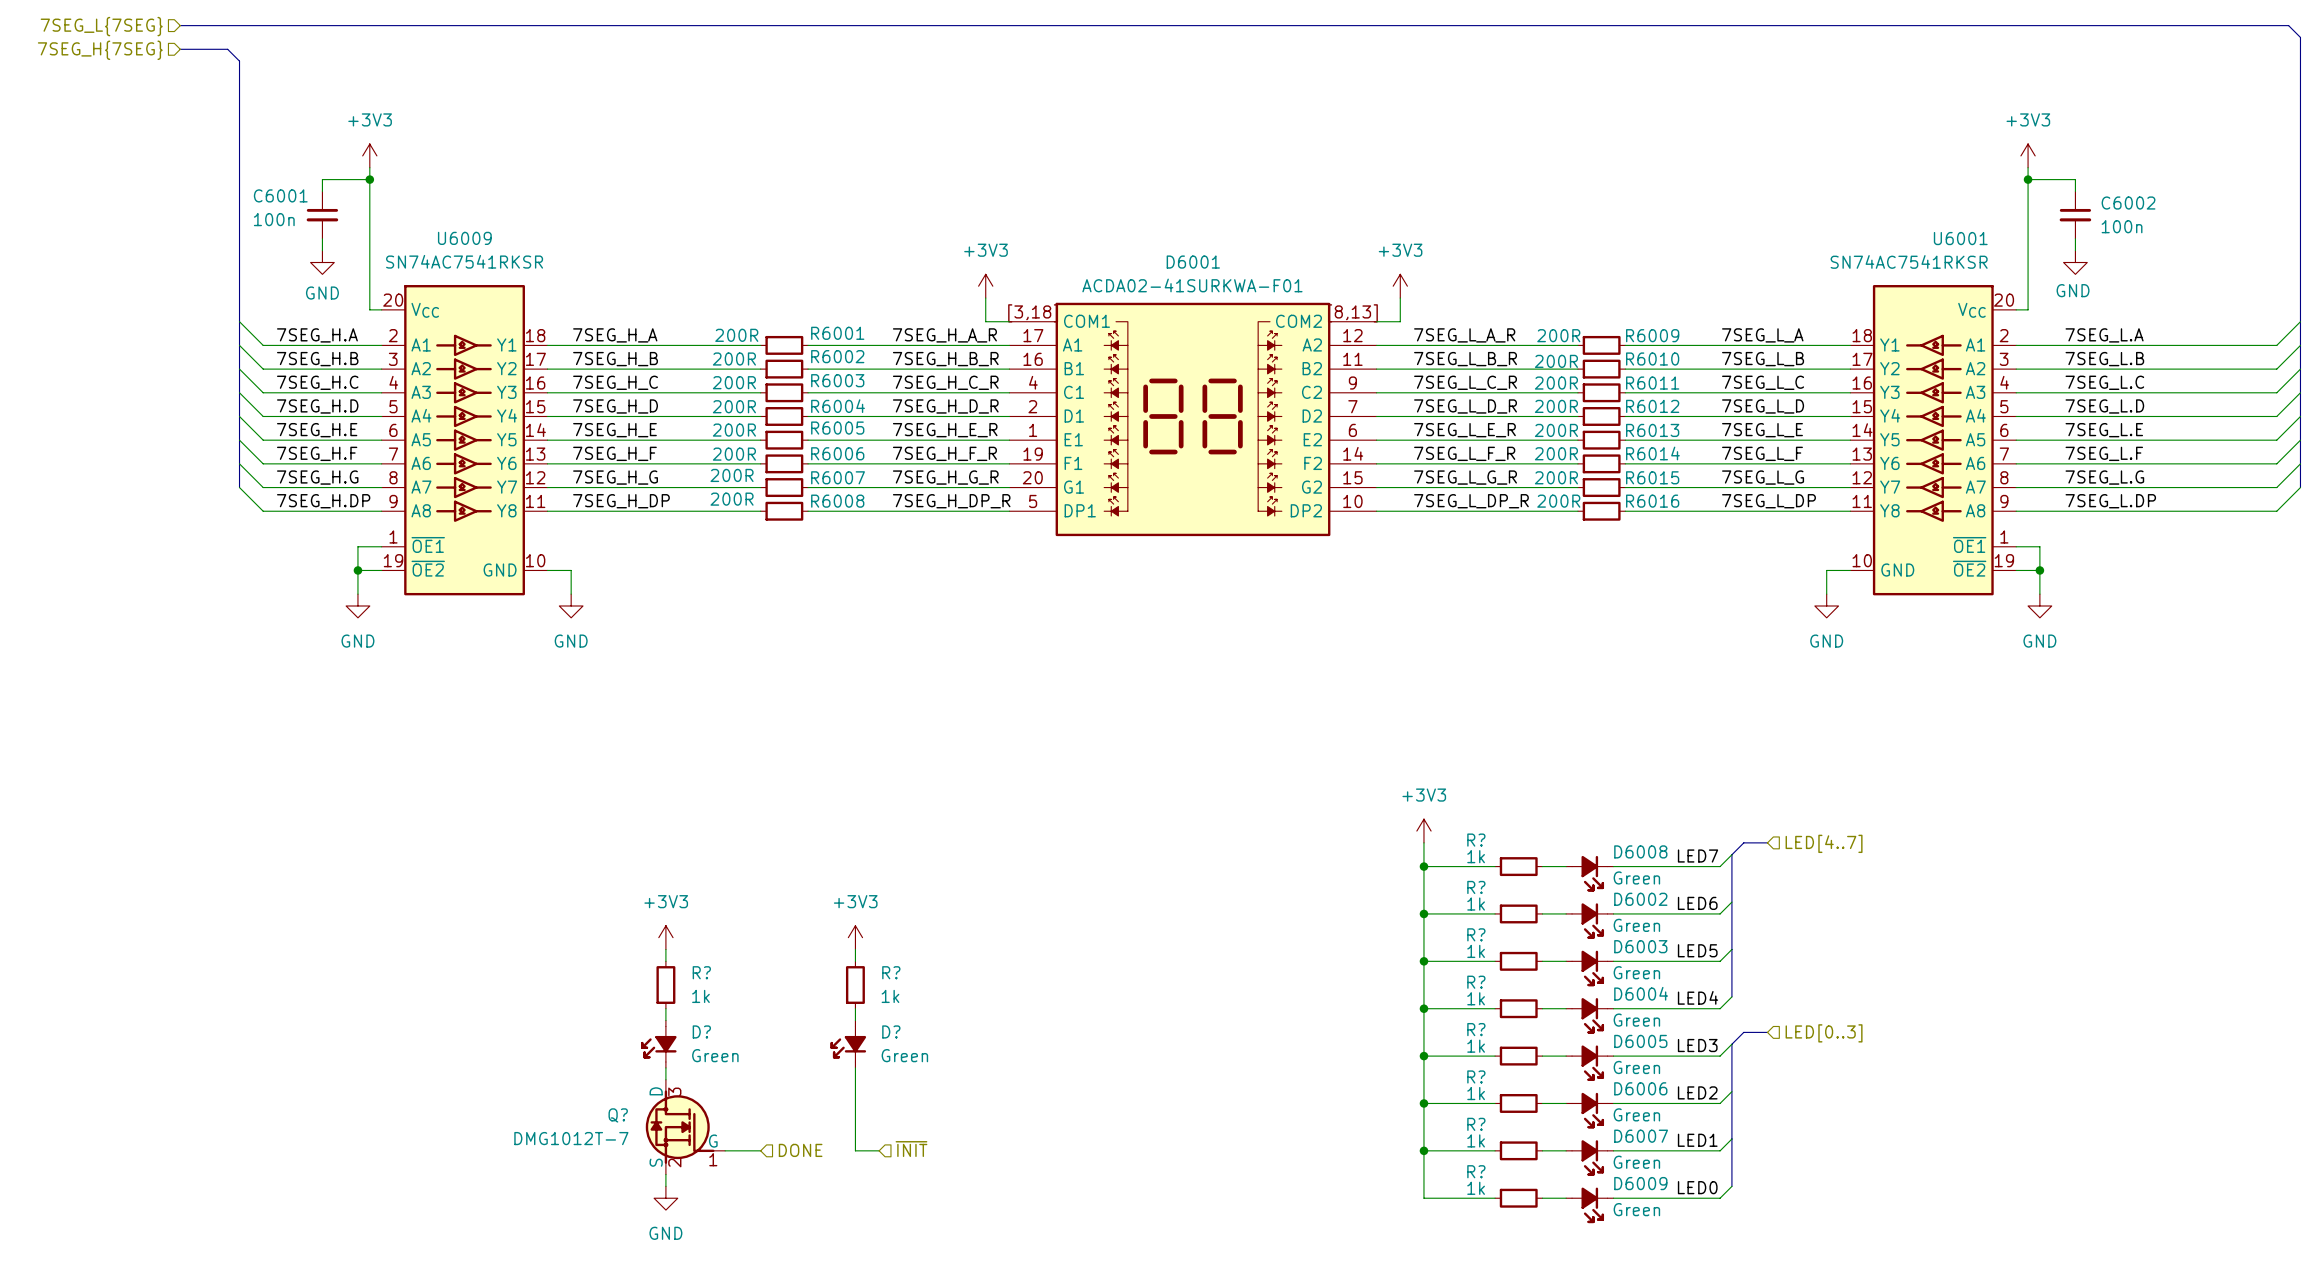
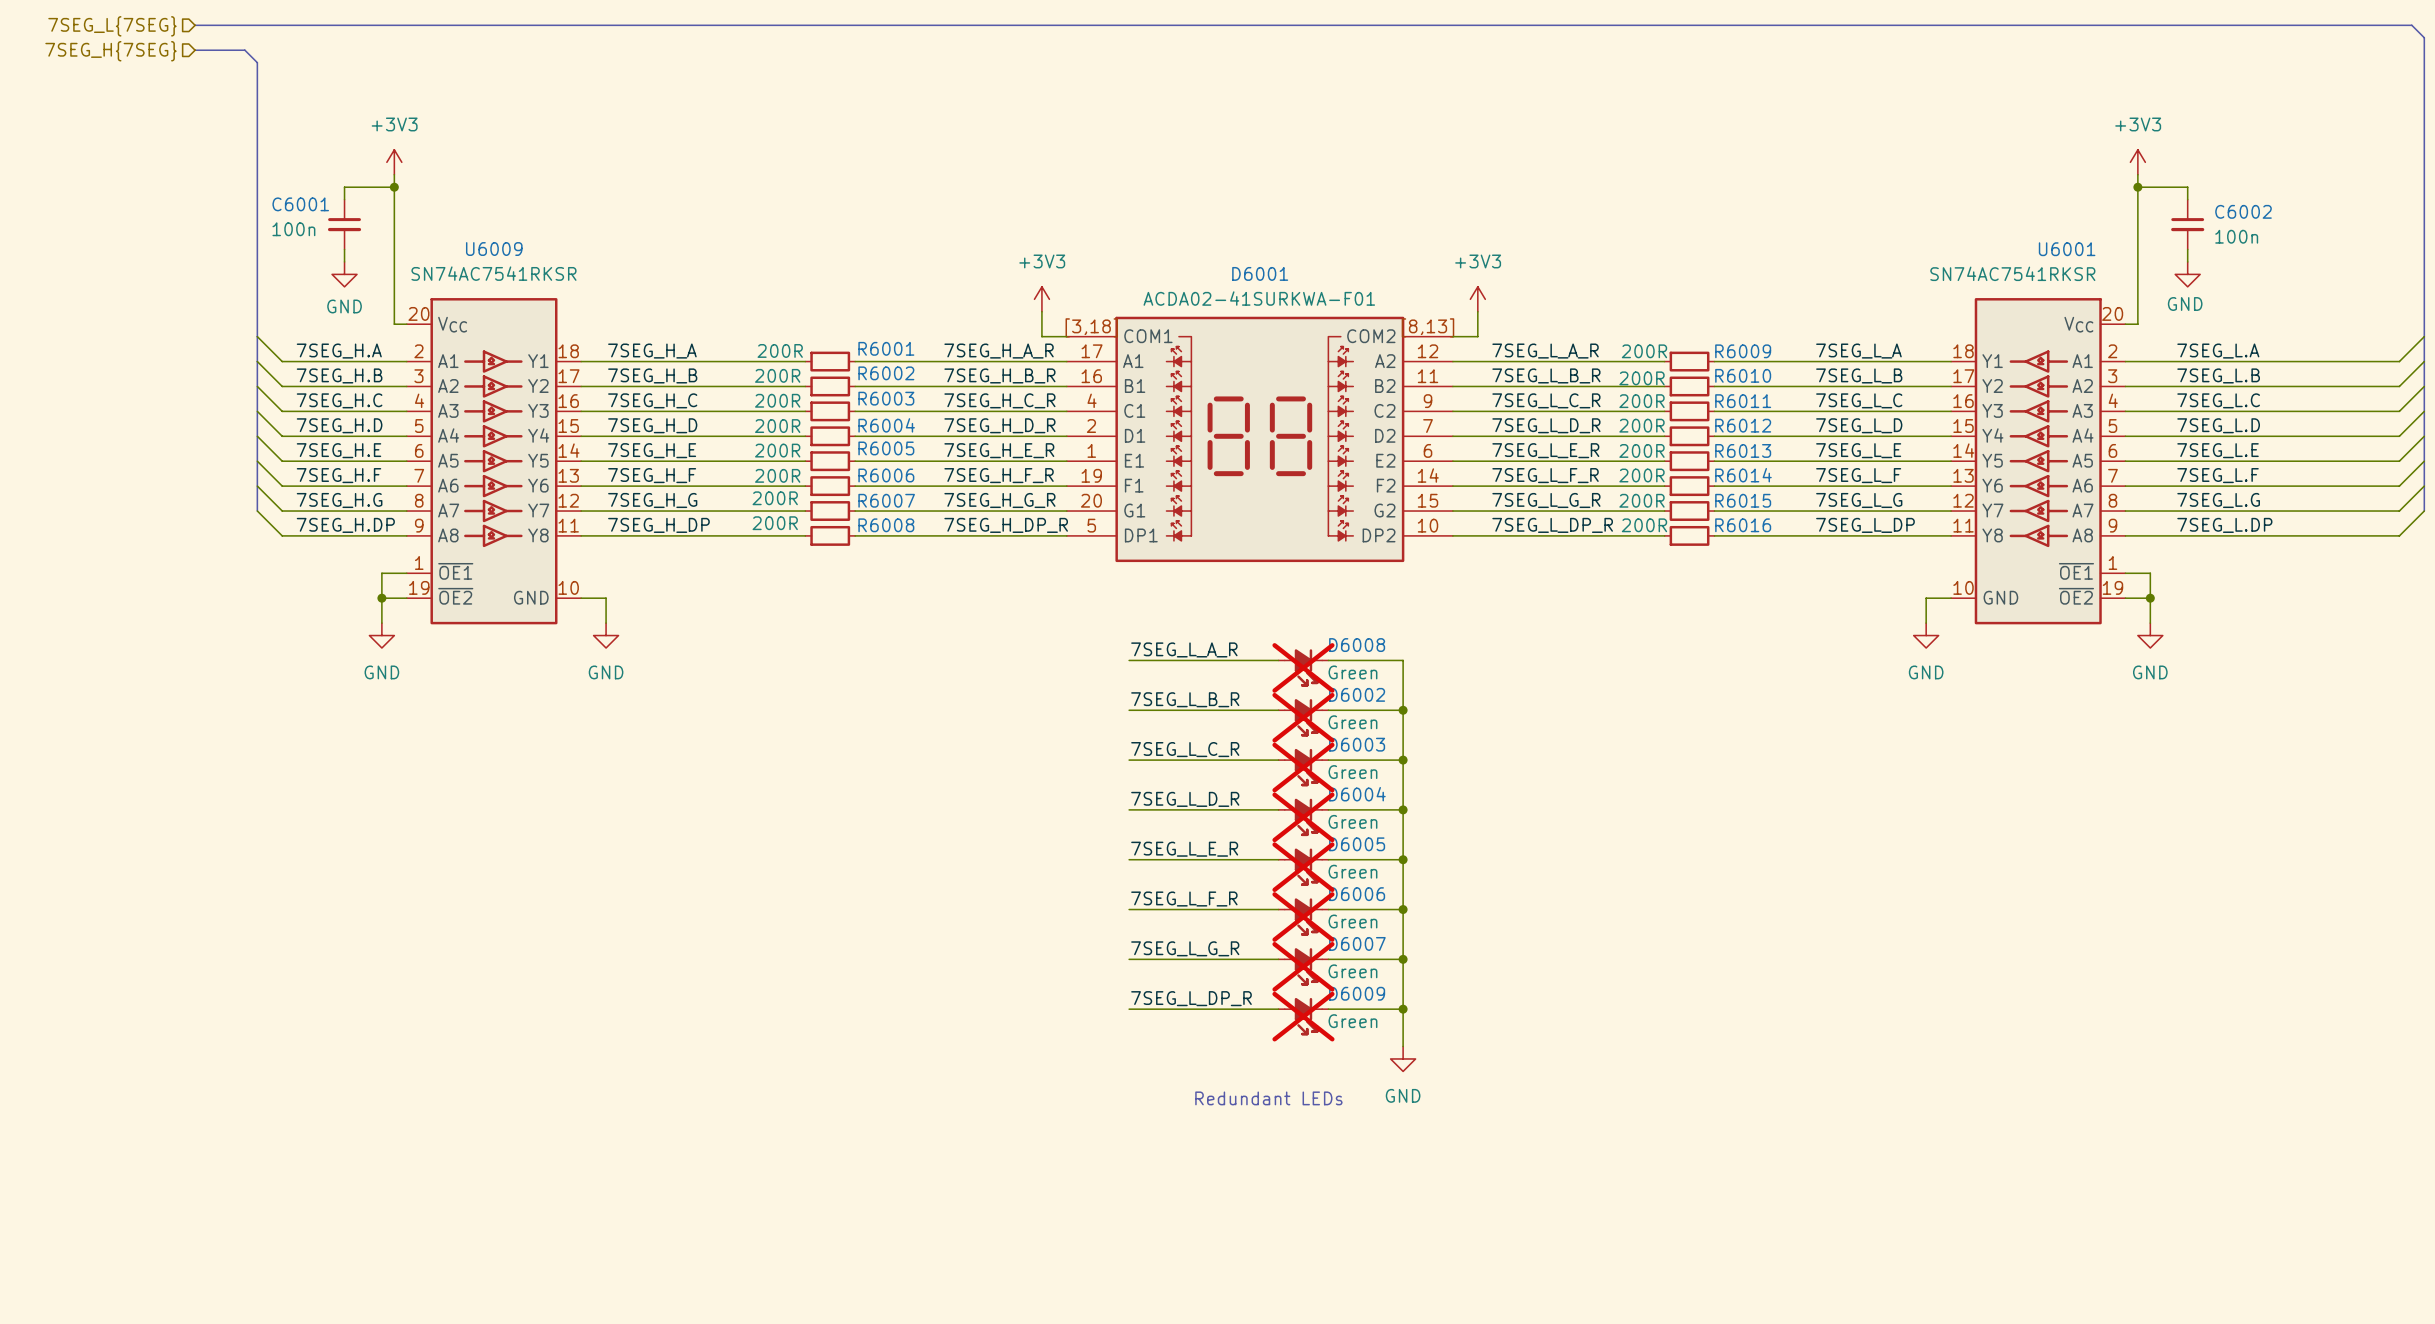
label: none -> 7SEG_L_A_R (1184, 649)
wire: none -> (1129, 660) (1278, 660)
wire: none -> (1328, 660) (1403, 660) (1403, 1046)
D6008 do-not-place cross: none -> (1303, 667)
label: none -> 7SEG_L_B_R (1185, 699)
wire: none -> (1129, 710) (1278, 710)
wire: none -> (1328, 710) (1403, 710)
junction: none -> (1403, 710)
D6002 do-not-place cross: none -> (1303, 717)
label: none -> 7SEG_L_C_R (1185, 749)
wire: none -> (1129, 760) (1278, 760)
junction: none -> (1403, 760)
D6003 do-not-place cross: none -> (1303, 767)
label: none -> 7SEG_L_D_R (1185, 799)
wire: none -> (1129, 809) (1278, 809)
junction: none -> (1403, 809)
D6004 do-not-place cross: none -> (1303, 817)
label: none -> 7SEG_L_E_R (1184, 849)
wire: none -> (1129, 859) (1278, 859)
junction: none -> (1403, 859)
D6005 do-not-place cross: none -> (1303, 867)
power symbol: +3V3 (1423, 831) -> none
wire: (1423, 842) (1423, 1198) (1495, 1198) -> none
bus: (1767, 842) (1743, 842) (1731, 854) (1731, 996) -> none
hierarchical label: LED[4..7] (1824, 843) -> none
wire: (1731, 854) (1720, 866) (1613, 866) -> none
label: none -> 7SEG_L_F_R (1184, 899)
label: LED7 (1698, 856) -> none
wire: none -> (1129, 909) (1278, 909)
junction: none -> (1403, 909)
wire: (1423, 866) (1495, 866) -> (1328, 760) (1403, 760)
junction: (1423, 866) -> none
R?: (1518, 866) -> none
wire: (1542, 866) (1566, 866) -> none
D6006 do-not-place cross: none -> (1303, 917)
D6008 position: (1589, 873) -> (1303, 667)
wire: (1731, 902) (1720, 913) (1613, 913) -> none
label: none -> 7SEG_L_G_R (1185, 948)
label: LED6 (1697, 903) -> none
wire: none -> (1129, 959) (1278, 959)
junction: none -> (1403, 959)
wire: (1423, 913) (1495, 913) -> (1328, 809) (1403, 809)
junction: (1423, 913) -> none
R?: (1518, 913) -> none
wire: (1542, 913) (1566, 913) -> none
D6007 do-not-place cross: none -> (1303, 966)
D6002 position: (1589, 921) -> (1303, 717)
power symbol: +3V3 (665, 937) -> none
power symbol: +3V3 (855, 937) -> none
wire: (665, 949) (665, 961) -> none
wire: (855, 949) (855, 961) -> none
wire: (1731, 949) (1720, 961) (1613, 961) -> none
label: LED5 (1697, 950) -> none
label: none -> 7SEG_L_DP_R (1191, 998)
wire: none -> (1129, 1009) (1278, 1009)
junction: none -> (1403, 1009)
wire: (1423, 961) (1495, 961) -> (1328, 859) (1403, 859)
junction: (1423, 961) -> none
R?: (1518, 961) -> none
wire: (1542, 961) (1566, 961) -> none
D6009 do-not-place cross: none -> (1303, 1016)
D6003 position: (1589, 968) -> (1303, 767)
R?: (665, 985) -> none
R?: (855, 985) -> none
wire: (1731, 996) (1720, 1008) (1613, 1008) -> none
label: LED4 (1698, 997) -> none
wire: (665, 1008) (665, 1020) -> none
wire: (855, 1008) (855, 1020) -> none
power symbol: none -> GND (1403, 1058)
wire: (1423, 1008) (1495, 1008) -> (1328, 909) (1403, 909)
junction: (1423, 1008) -> none
R?: (1518, 1008) -> none
wire: (1542, 1008) (1566, 1008) -> none
D6004 position: (1589, 1015) -> (1303, 817)
bus: (1767, 1032) (1743, 1032) (1731, 1044) (1731, 1186) -> none
hierarchical label: LED[0..3] (1824, 1033) -> none
D?: (658, 1044) -> none
D?: (848, 1044) -> none
wire: (1731, 1044) (1720, 1056) (1613, 1056) -> none
label: LED3 (1697, 1045) -> none
text: none -> Redundant LEDs (1268, 1098)
wire: (1423, 1056) (1495, 1056) -> (1328, 959) (1403, 959)
junction: (1423, 1056) -> none
R?: (1518, 1056) -> none
wire: (1542, 1056) (1566, 1056) -> none
D6005 position: (1589, 1063) -> (1303, 867)
wire: (665, 1067) (665, 1079) -> none
wire: (855, 1067) (855, 1150) (879, 1150) -> none
wire: (1731, 1091) (1720, 1103) (1613, 1103) -> none
label: LED2 (1697, 1092) -> none
wire: (1423, 1103) (1495, 1103) -> (1328, 1009) (1403, 1009)
junction: (1423, 1103) -> none
R?: (1518, 1103) -> none
wire: (1542, 1103) (1566, 1103) -> none
D6006 position: (1589, 1110) -> (1303, 917)
Q?: (685, 1127) -> none
wire: (1731, 1139) (1720, 1150) (1613, 1150) -> none
label: LED1 (1697, 1140) -> none
hierarchical label: ~{INIT} (911, 1149) -> none
wire: (725, 1150) (760, 1150) -> none
hierarchical label: DONE (800, 1150) -> none
wire: (1423, 1150) (1495, 1150) -> none
junction: (1423, 1150) -> none
R?: (1518, 1150) -> none
wire: (1542, 1150) (1566, 1150) -> none
D6007 position: (1589, 1157) -> (1303, 966)
wire: (665, 1174) (665, 1186) -> none
wire: (1731, 1186) (1720, 1198) (1613, 1198) -> none
label: LED0 (1697, 1187) -> none
power symbol: GND (665, 1198) -> none
R?: (1518, 1198) -> none
wire: (1542, 1198) (1566, 1198) -> none
D6009 position: (1589, 1205) -> (1303, 1016)

